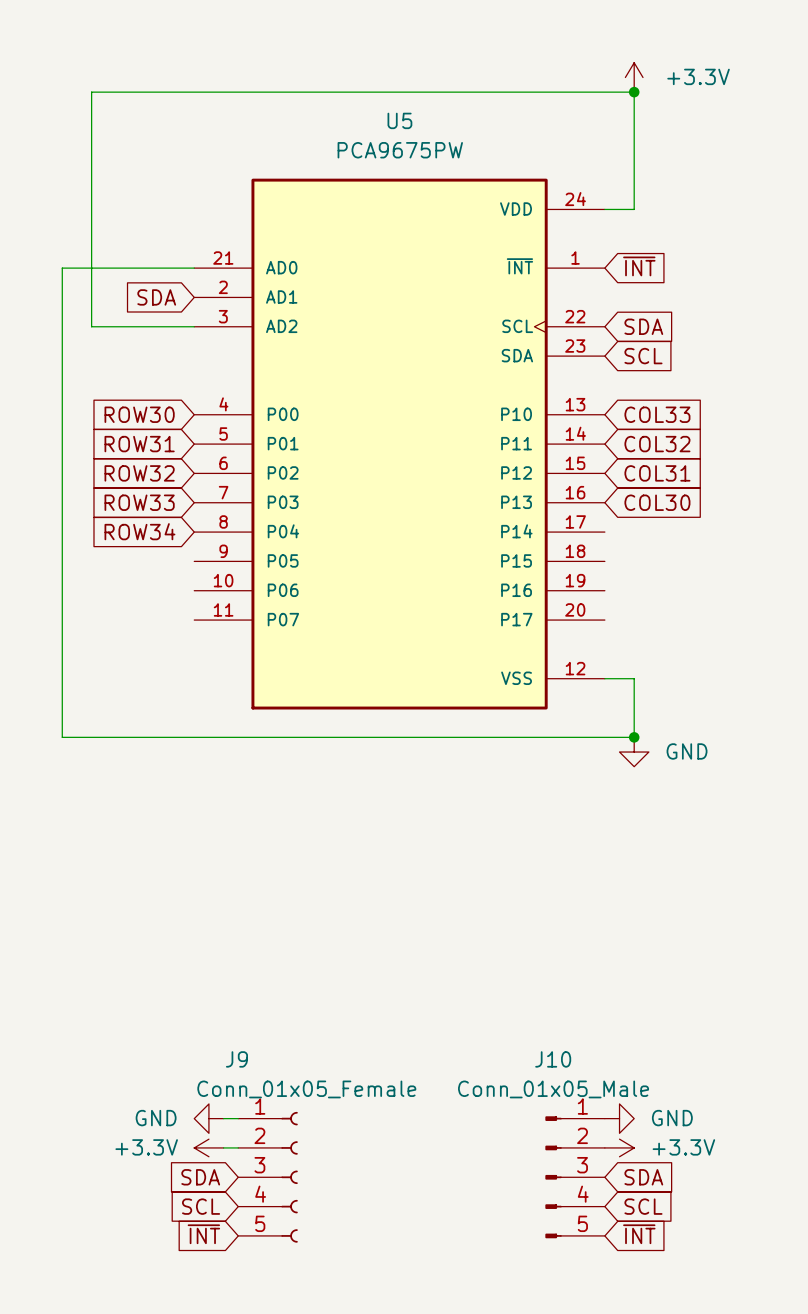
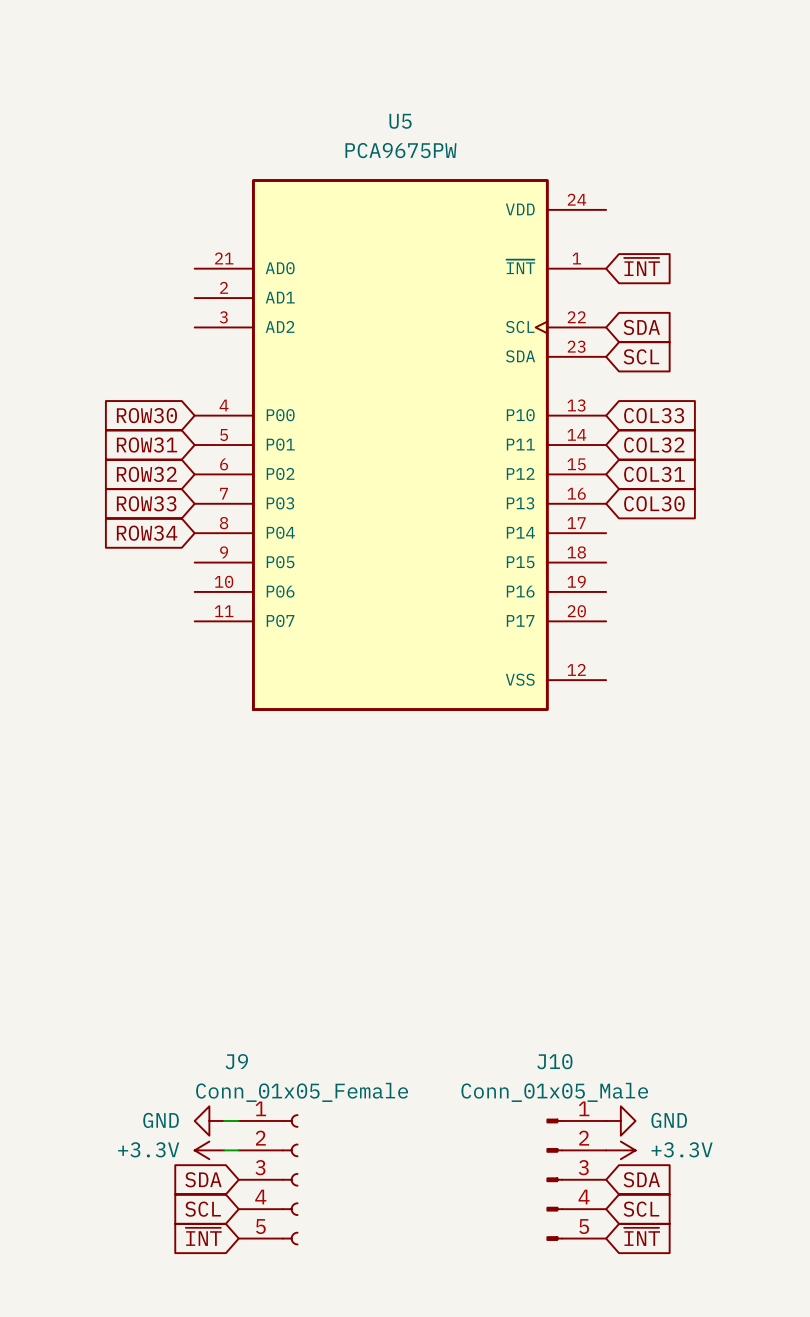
power symbol: +3.3V (634, 77) -> none
junction: (634, 92) -> none
wire: (604, 209) (634, 209) (634, 92) (91, 92) (91, 326) (194, 326) -> none
wire: (194, 268) (62, 268) (62, 737) (634, 737) (634, 678) (604, 678) -> none
global label: SDA (156, 297) -> none
junction: (634, 737) -> none
power symbol: GND (634, 752) -> none

